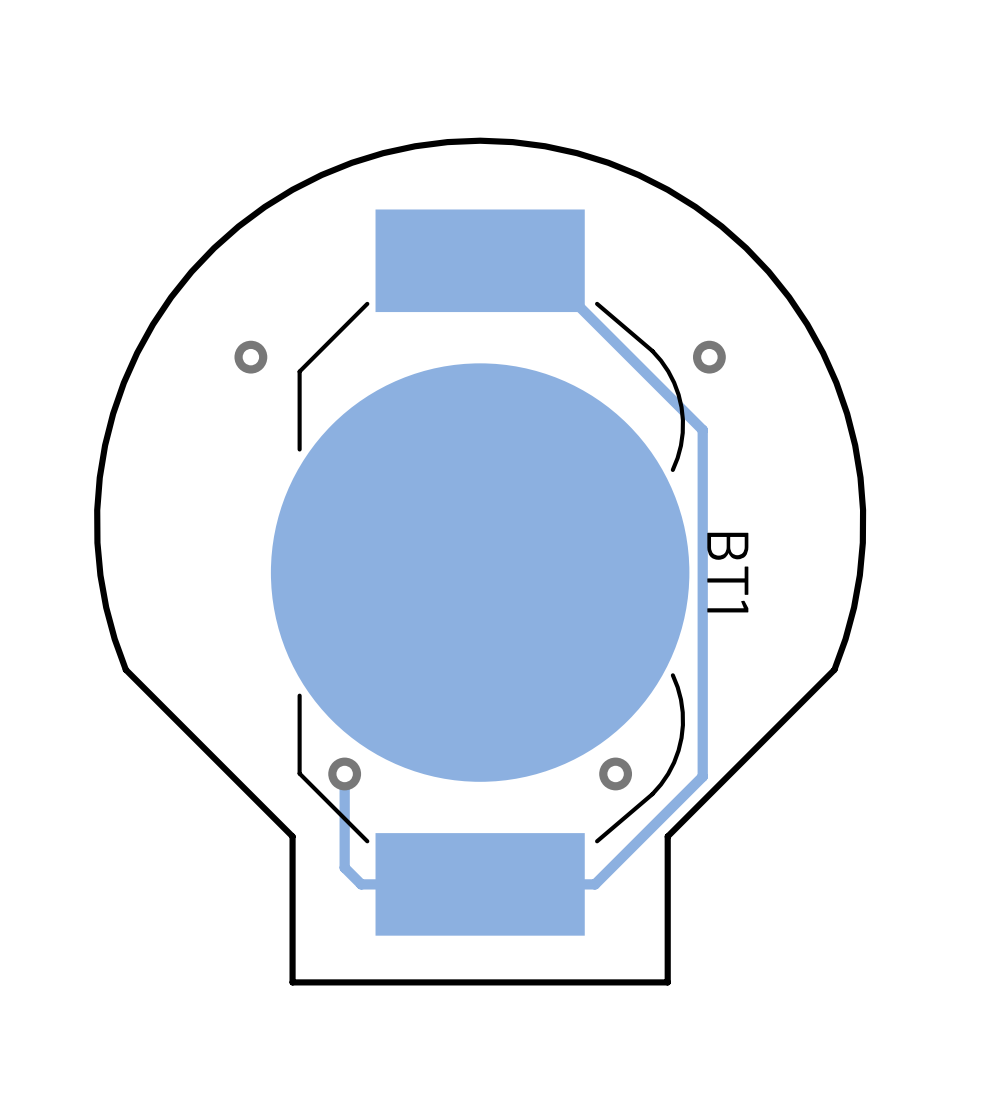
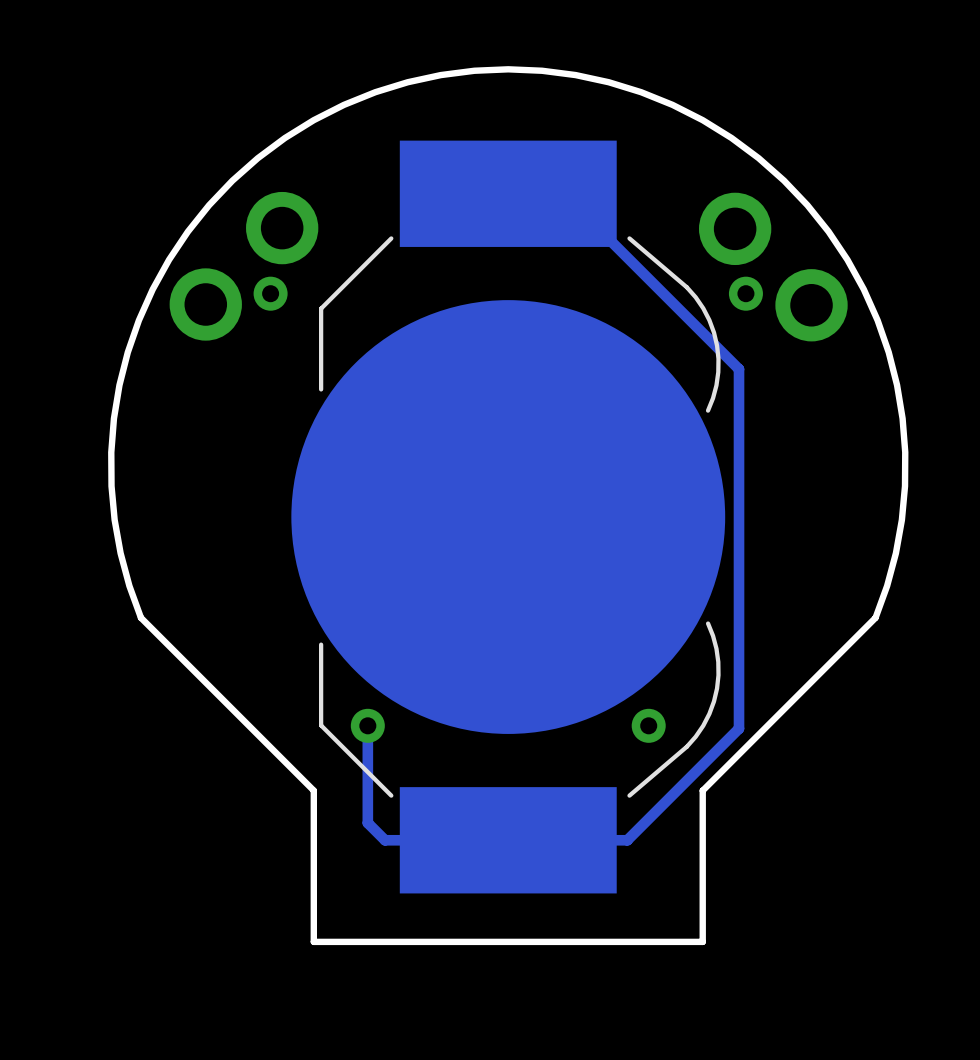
part: none -> (243, 266)
part: none -> (773, 267)
BT1 name: BT1 (727, 572) -> none

